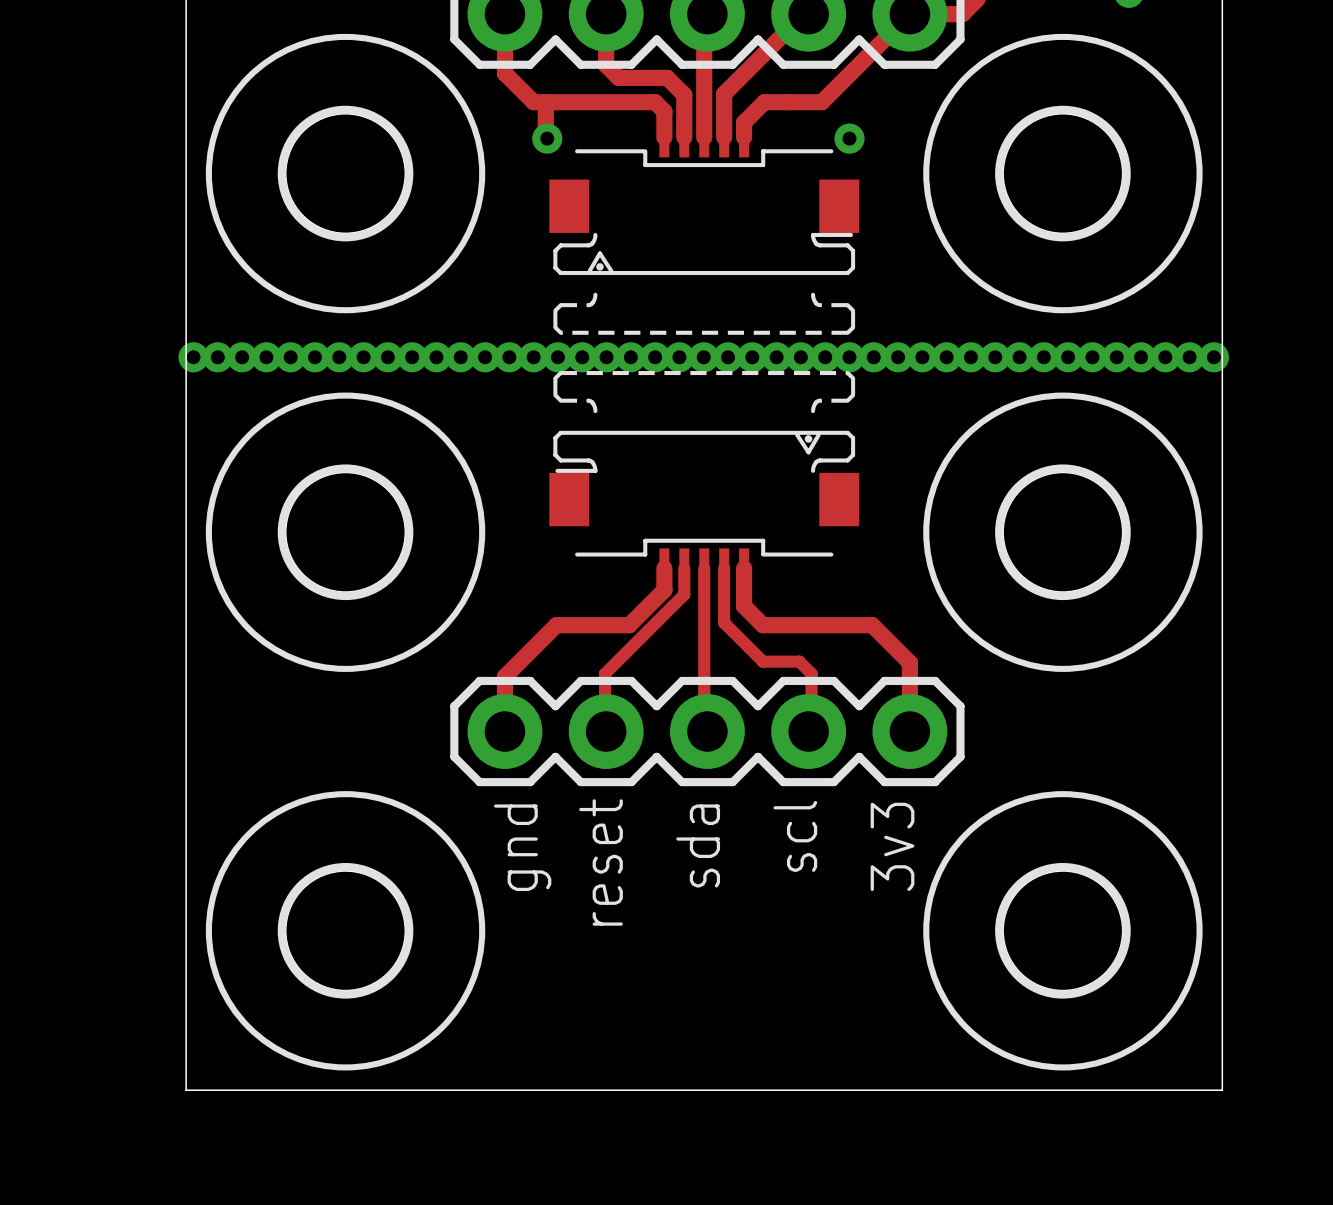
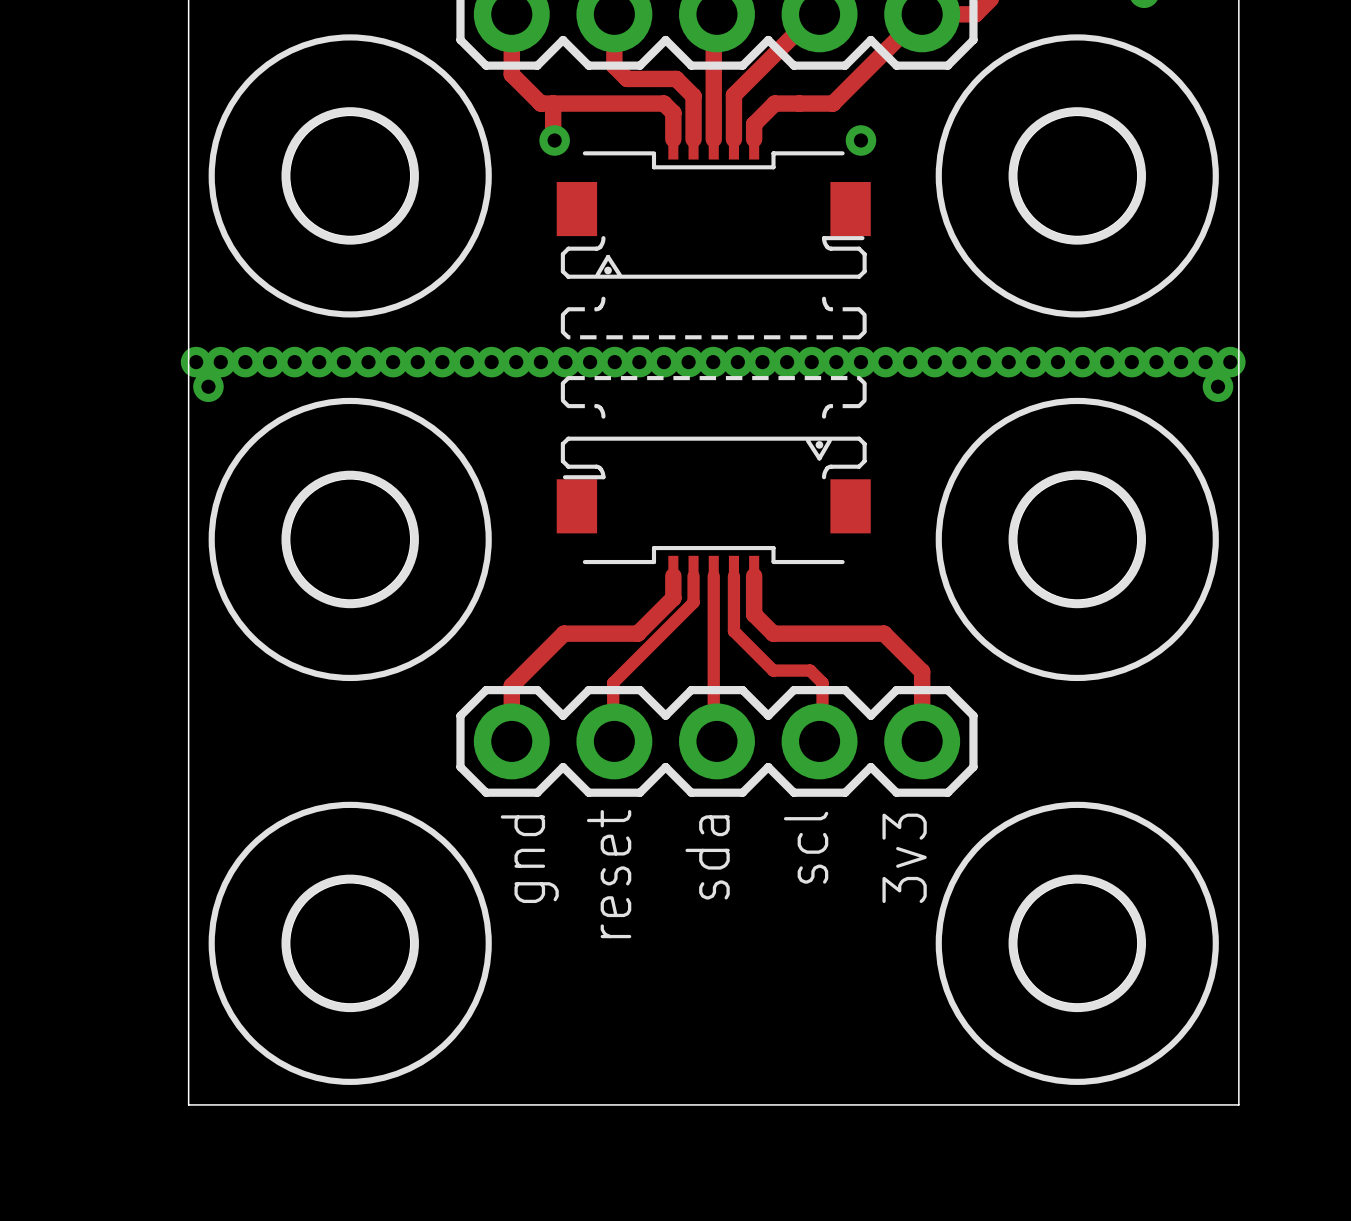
via: none -> (208, 386)
via: none -> (1218, 386)

